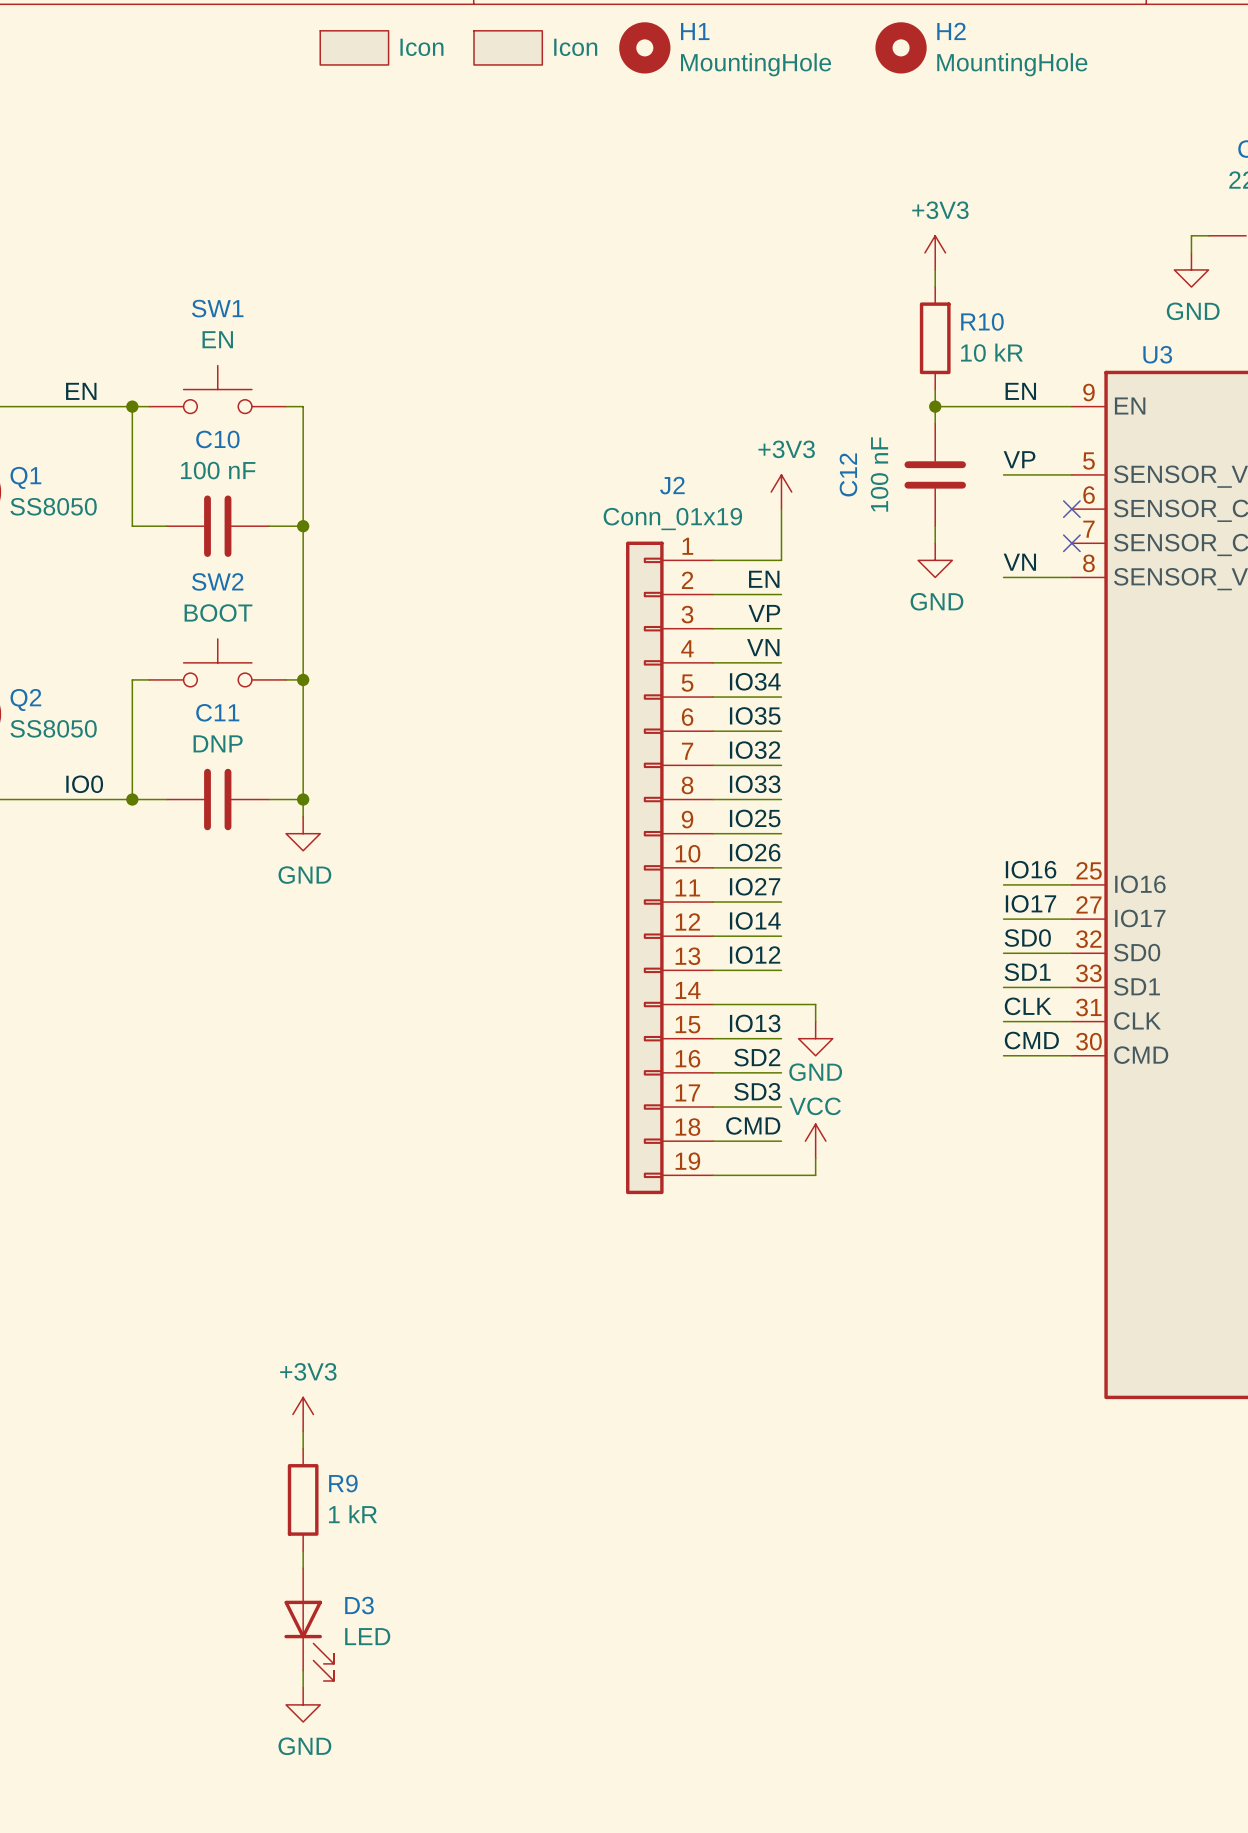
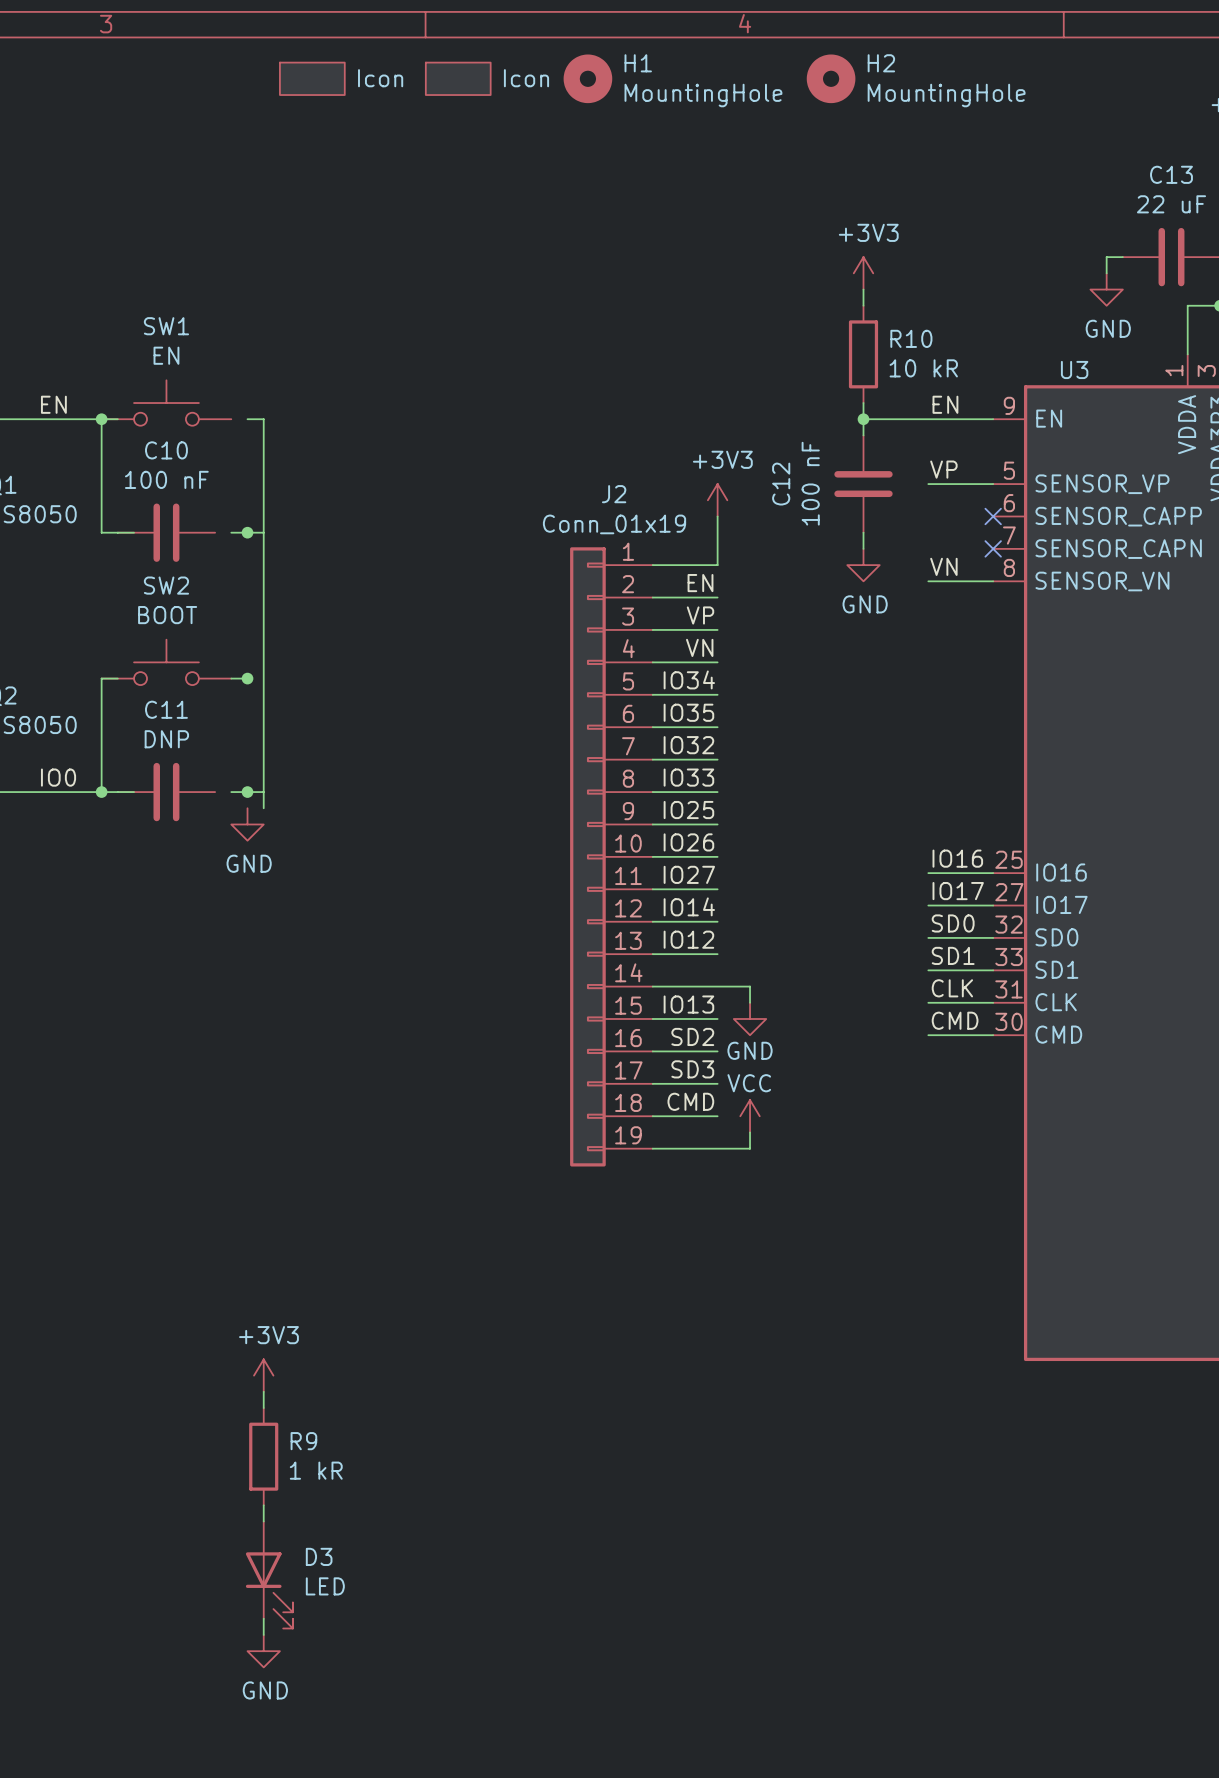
SW1 position: (217, 389) -> (166, 403)
C10 position: (217, 526) -> (166, 532)
junction position: (303, 526) -> (247, 532)
SW2 position: (217, 662) -> (166, 662)
junction position: (303, 679) -> (247, 678)
C11 position: (217, 799) -> (166, 792)
junction position: (303, 799) -> (247, 792)
power symbol position: GND (303, 833) -> GND (247, 824)

